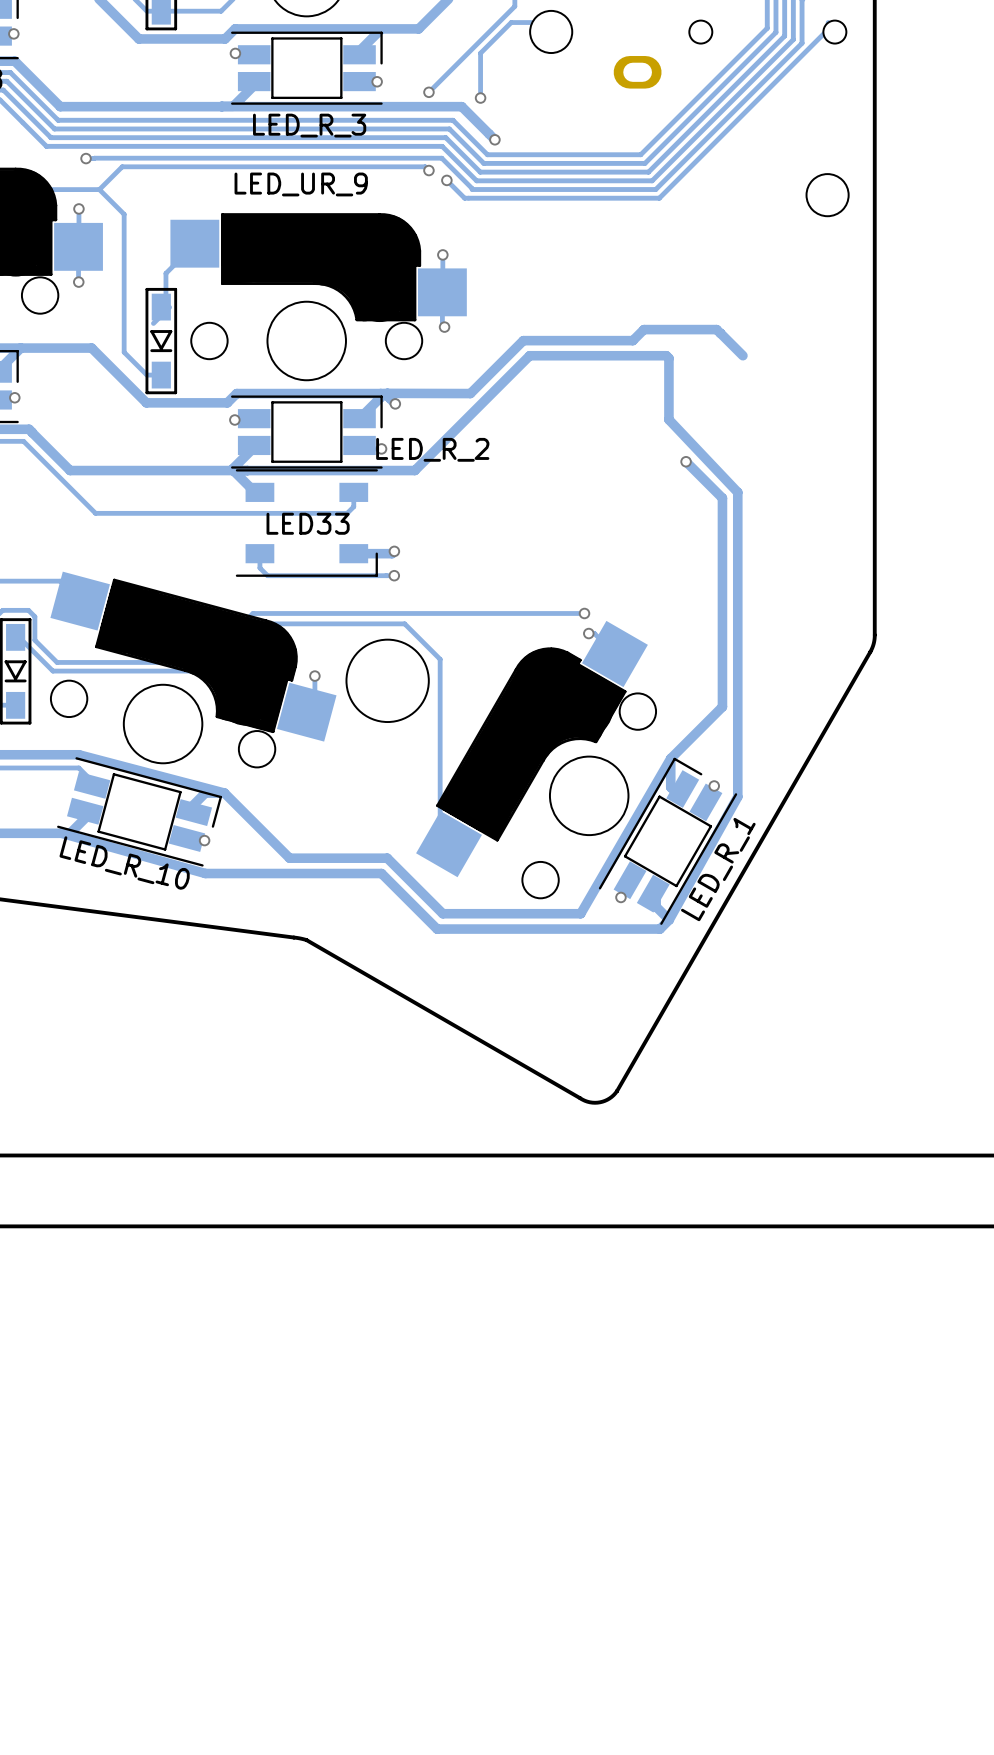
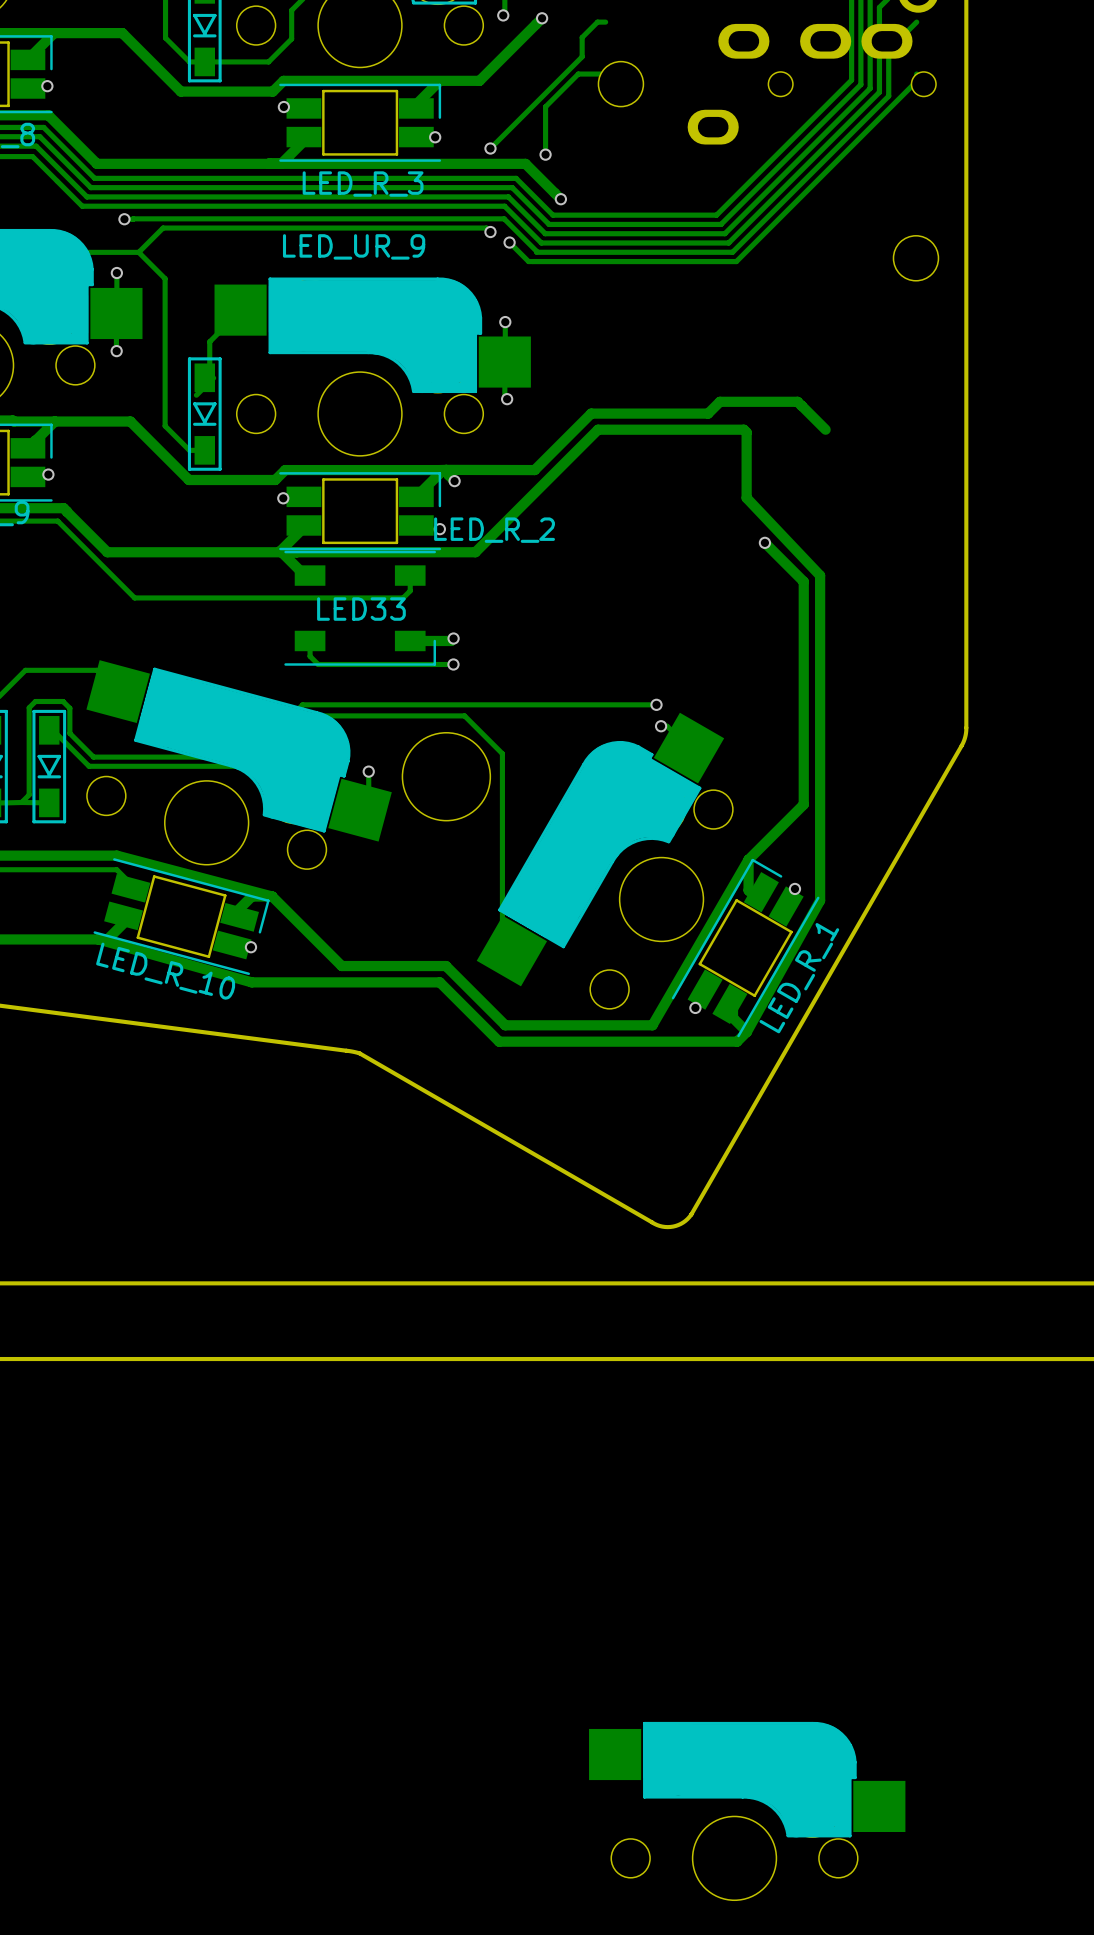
part: none -> (747, 1811)

